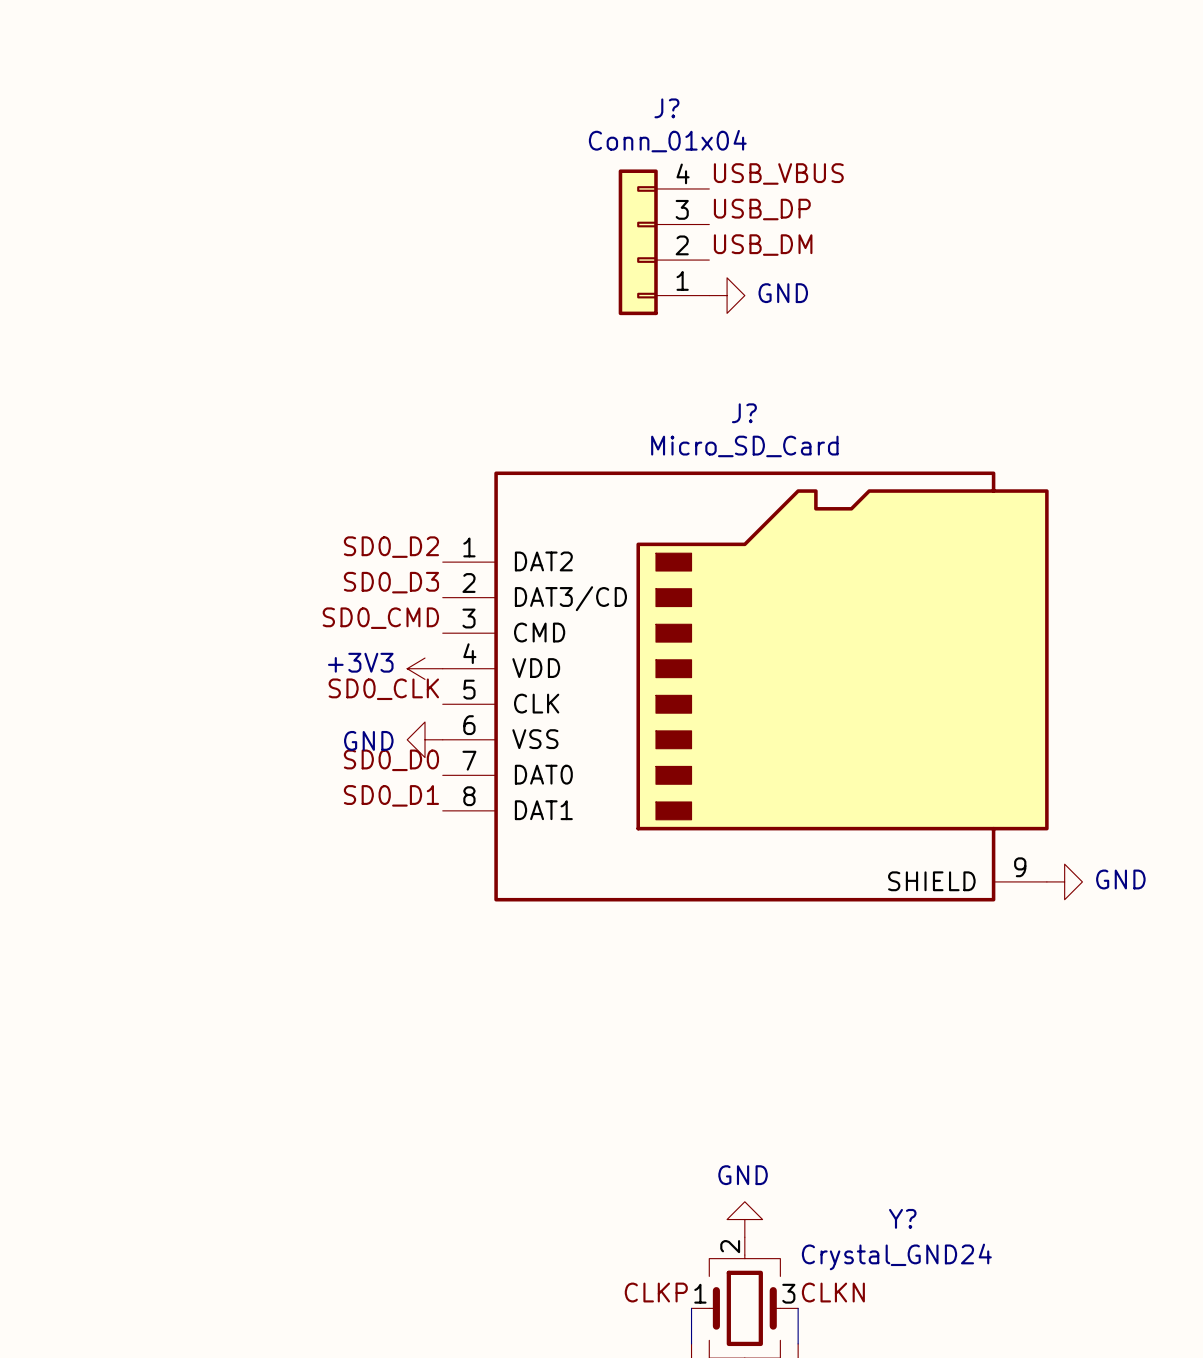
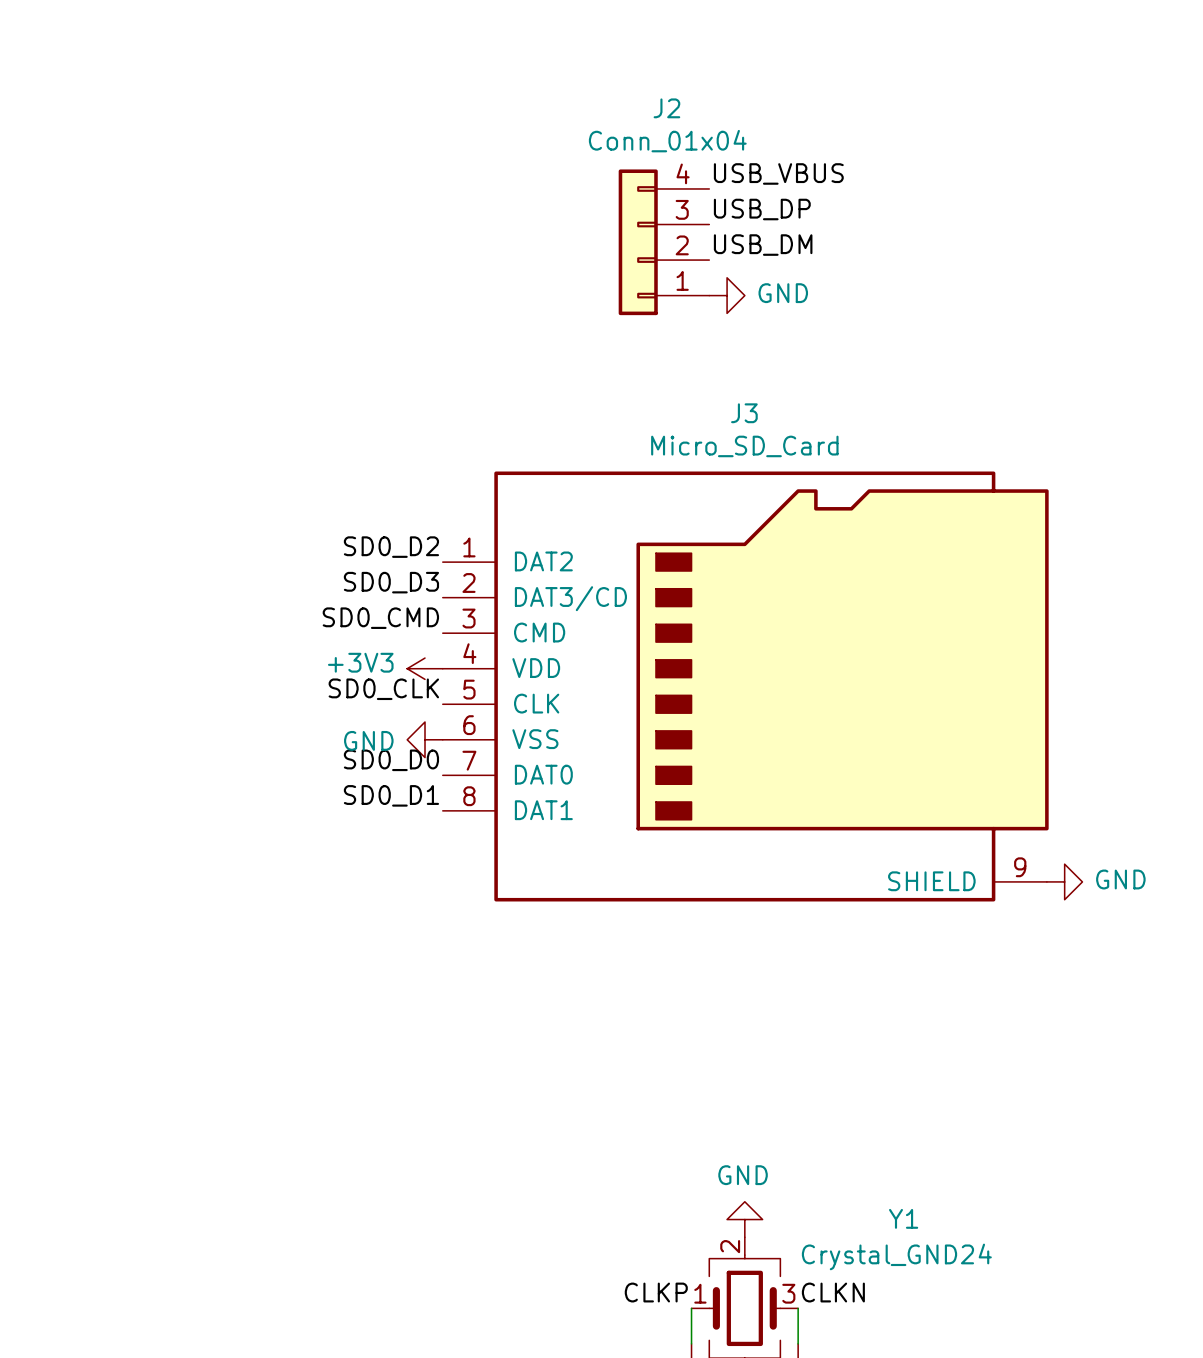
J? name: J? (666, 108) -> J2 (666, 108)
J? name: J? (744, 413) -> J3 (744, 413)
Y? name: Y? (902, 1218) -> Y1 (903, 1218)

